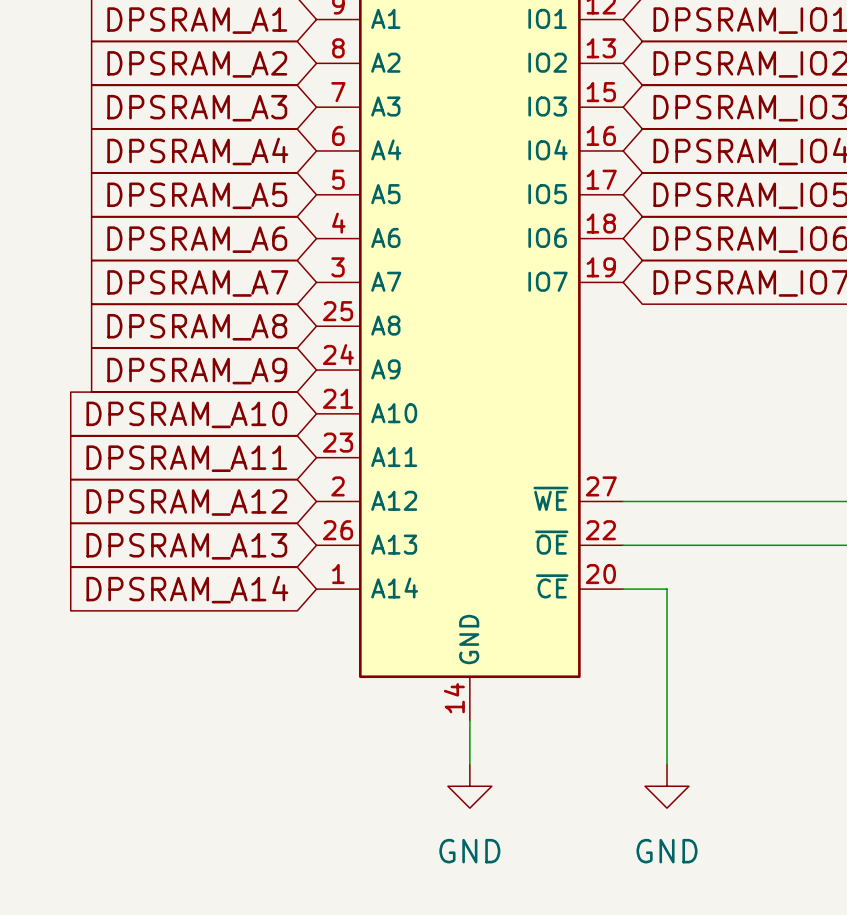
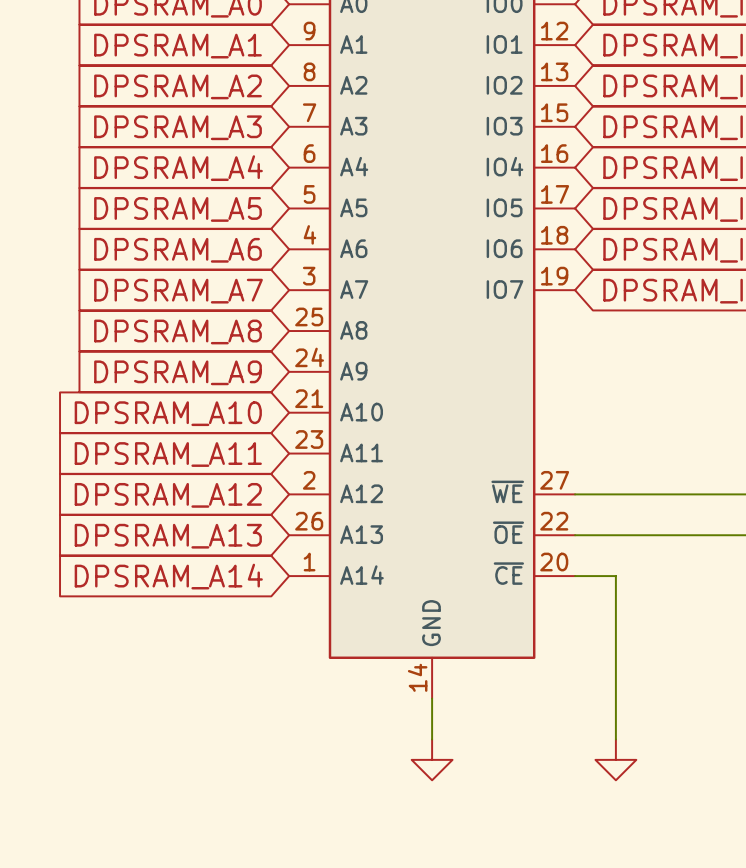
power symbol text: GND (469, 851) -> none
power symbol text: GND (667, 851) -> none

